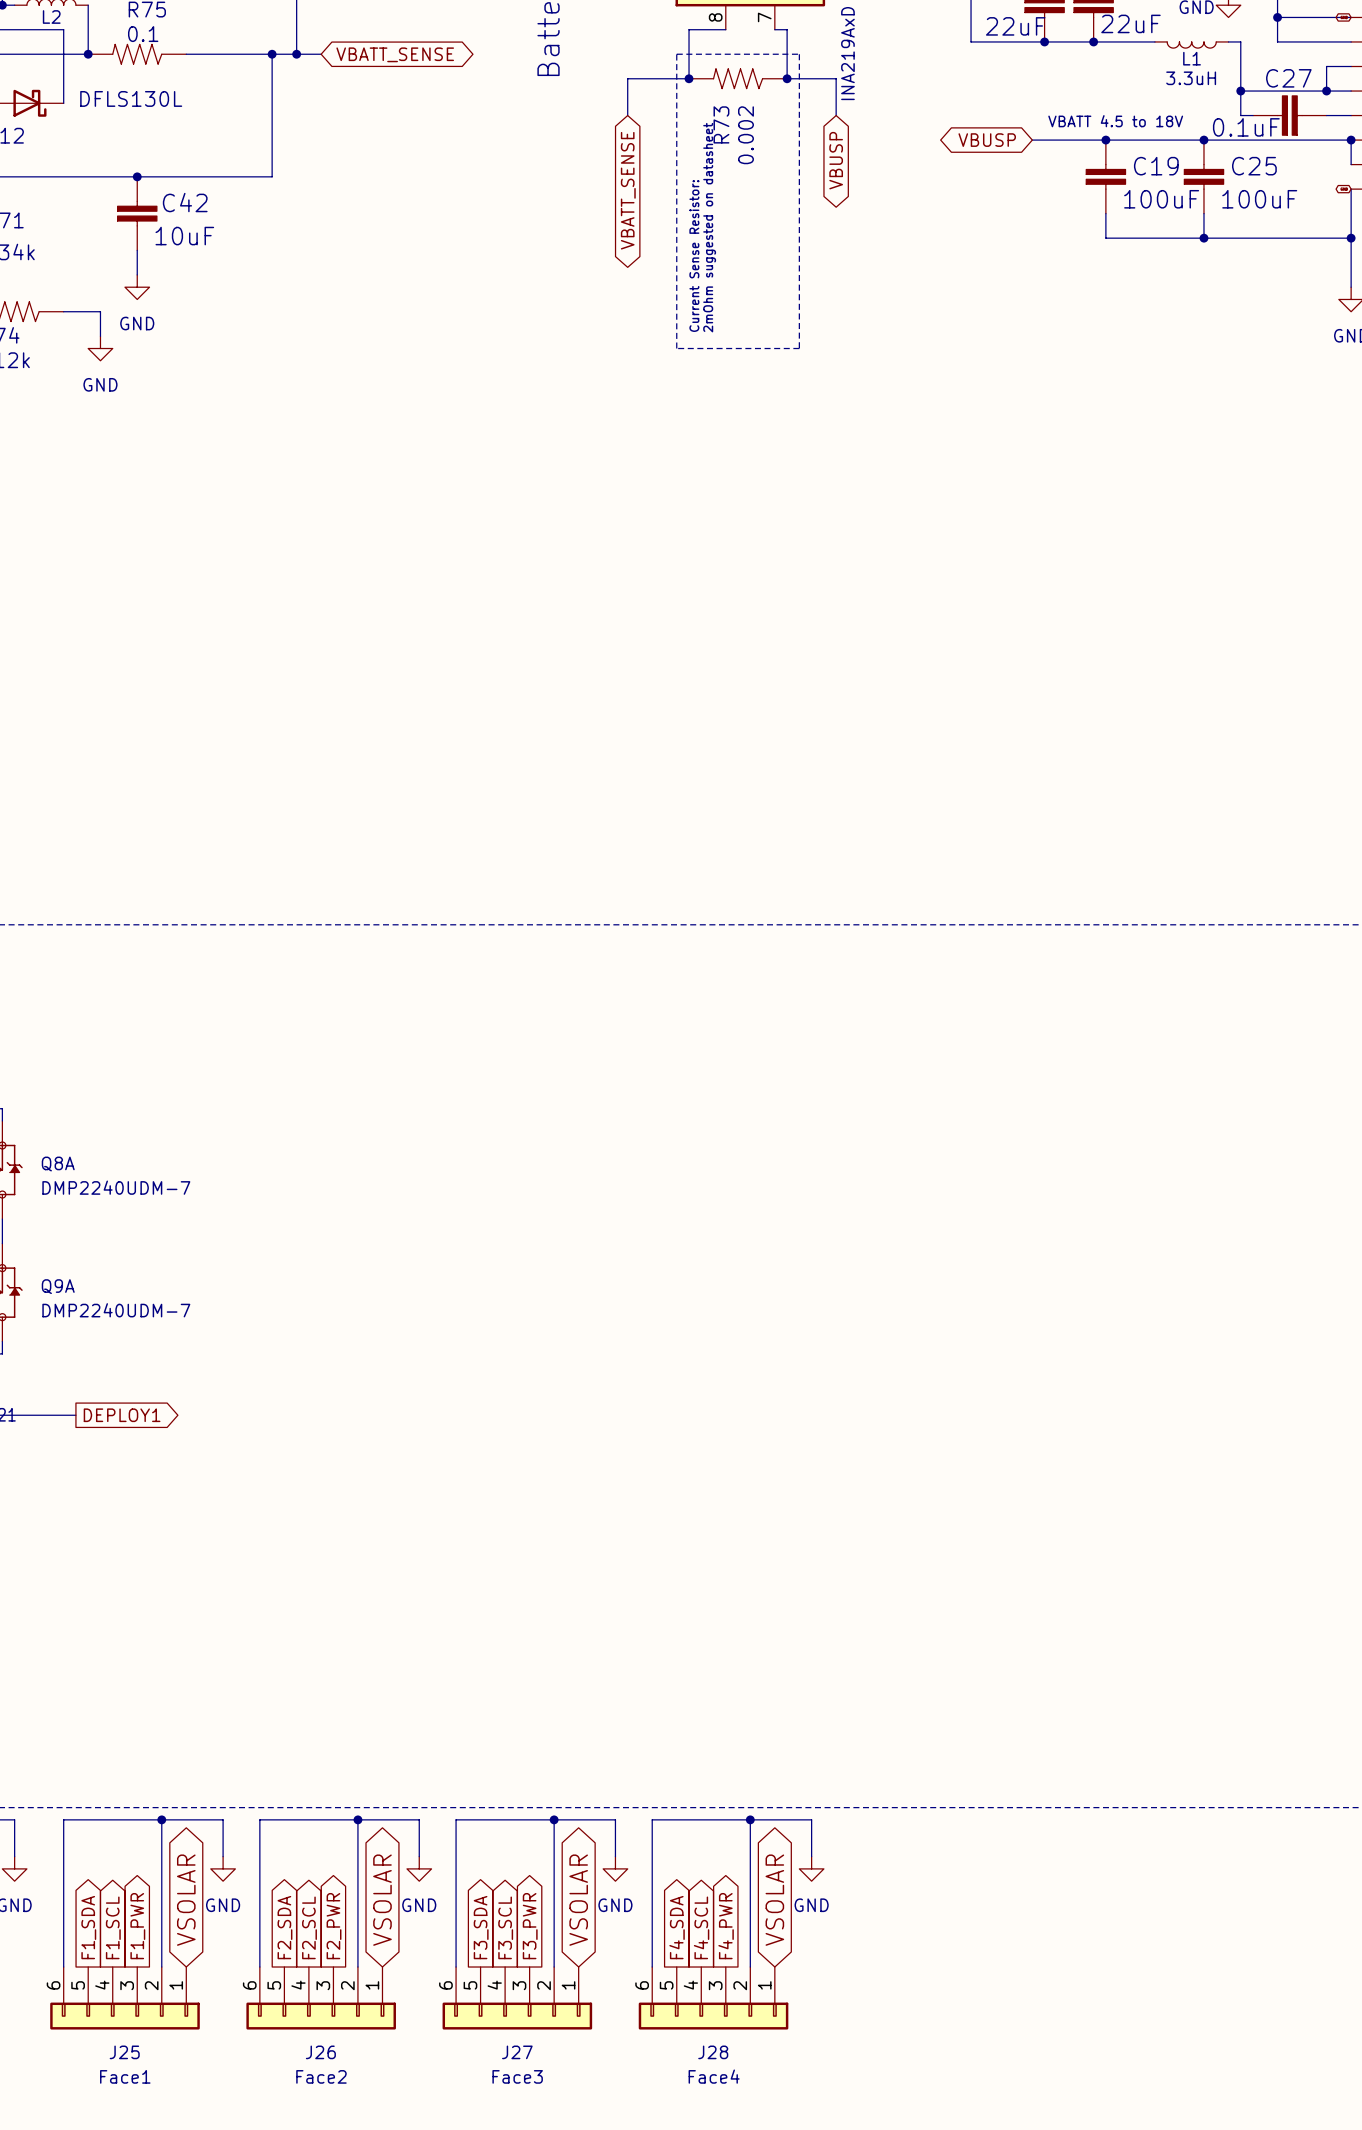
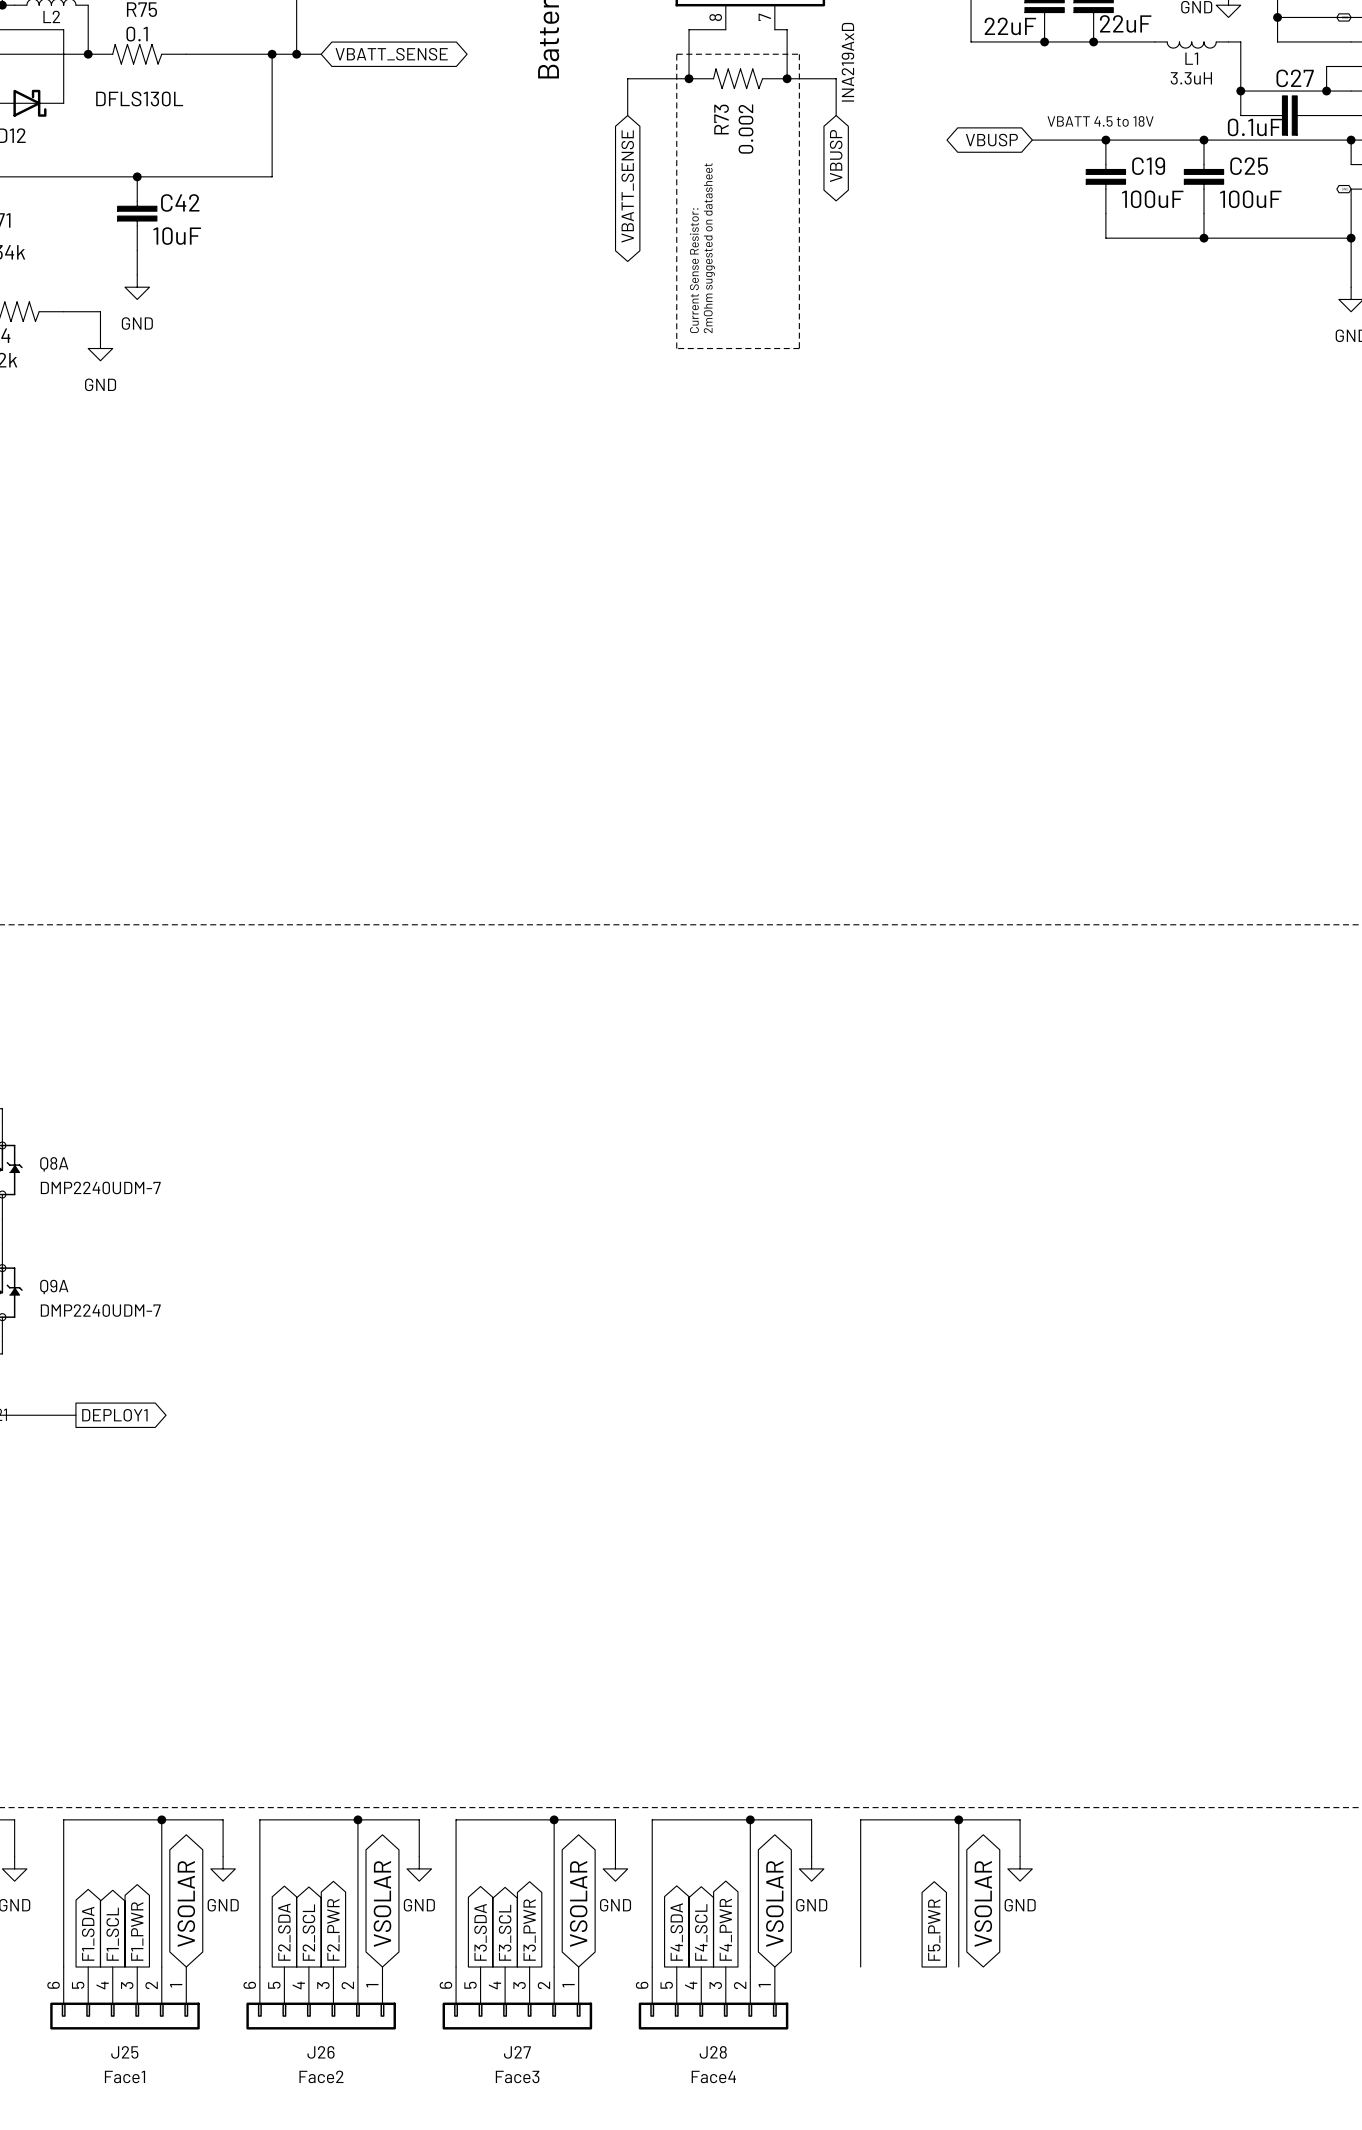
wire: none -> (958, 1819) (958, 1967)
junction: none -> (958, 1819)
wire: none -> (1020, 1856) (1020, 1819) (860, 1819) (860, 1967)
power symbol: none -> GND (1020, 1868)
global label: none -> VSOLAR (983, 1903)
global label: none -> F5_PWR (934, 1930)

